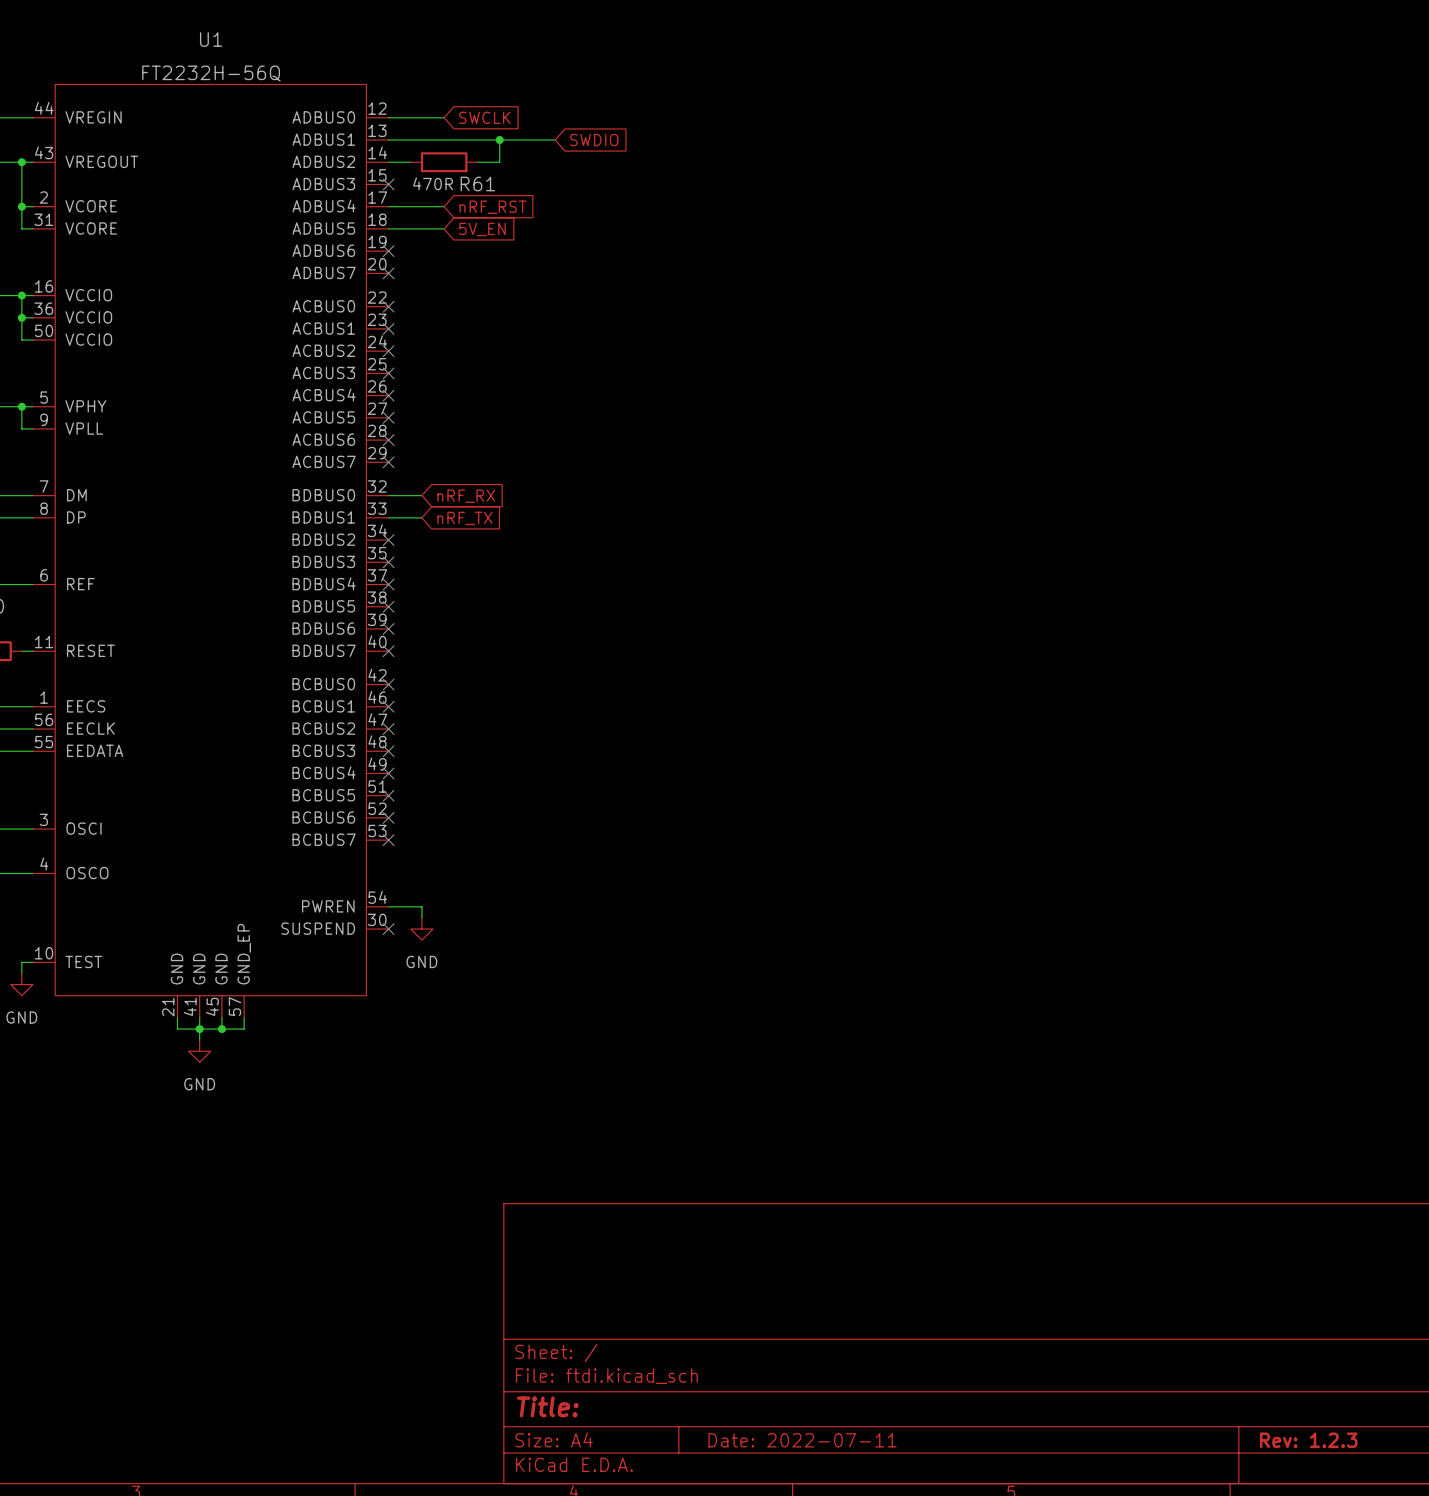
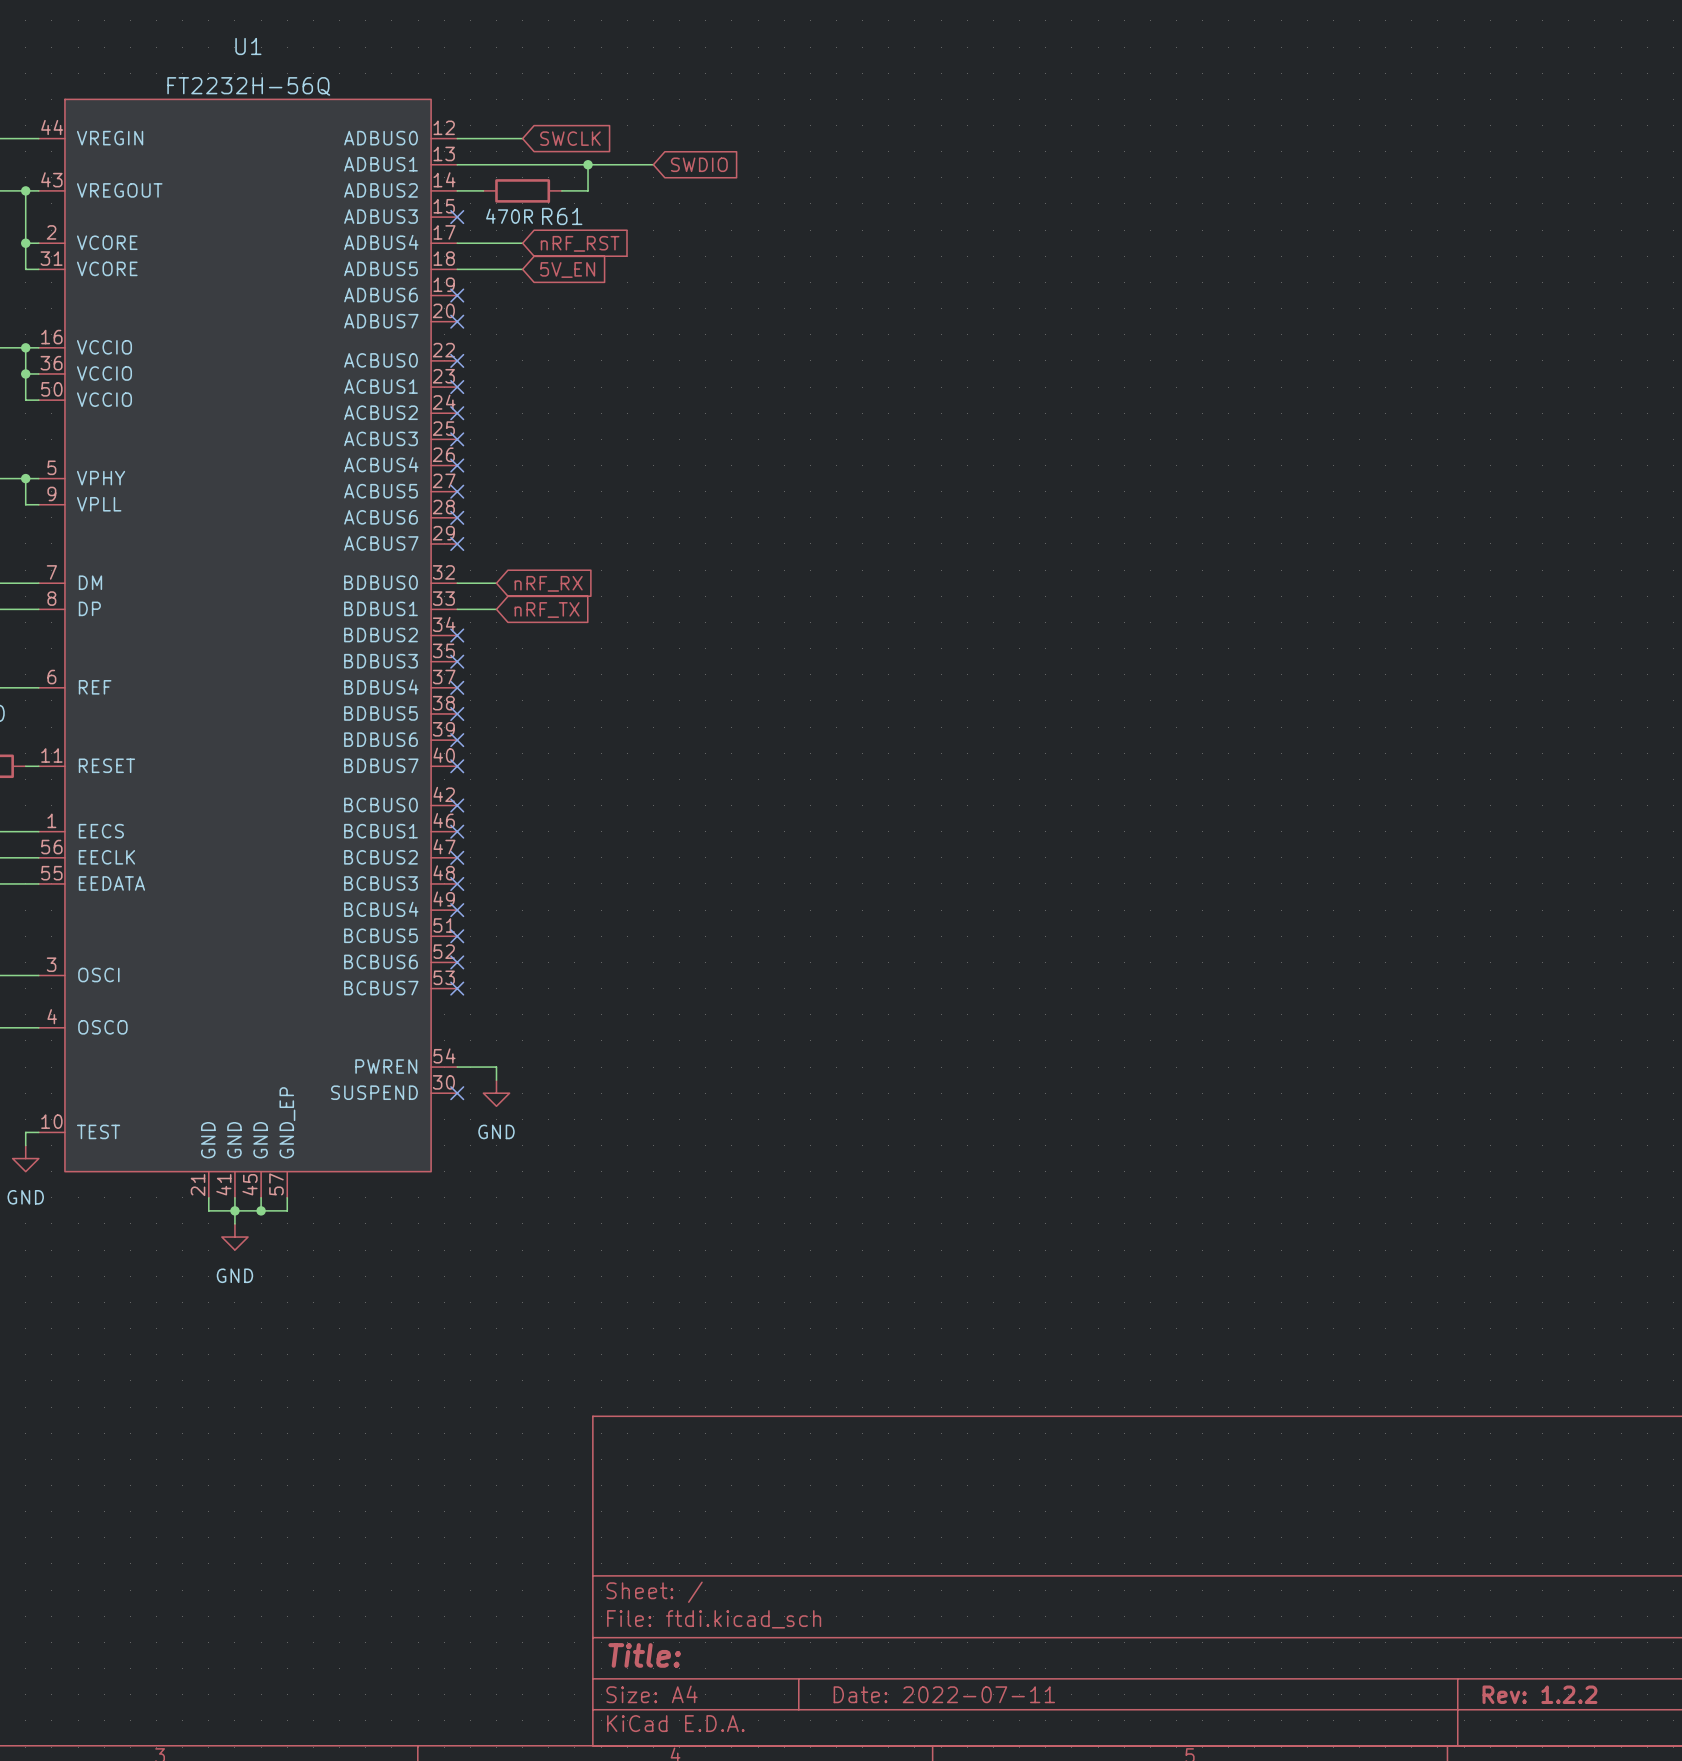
title block: Rev: 1.2.3 (1308, 1440) -> Rev: 1.2.2 (1539, 1694)

